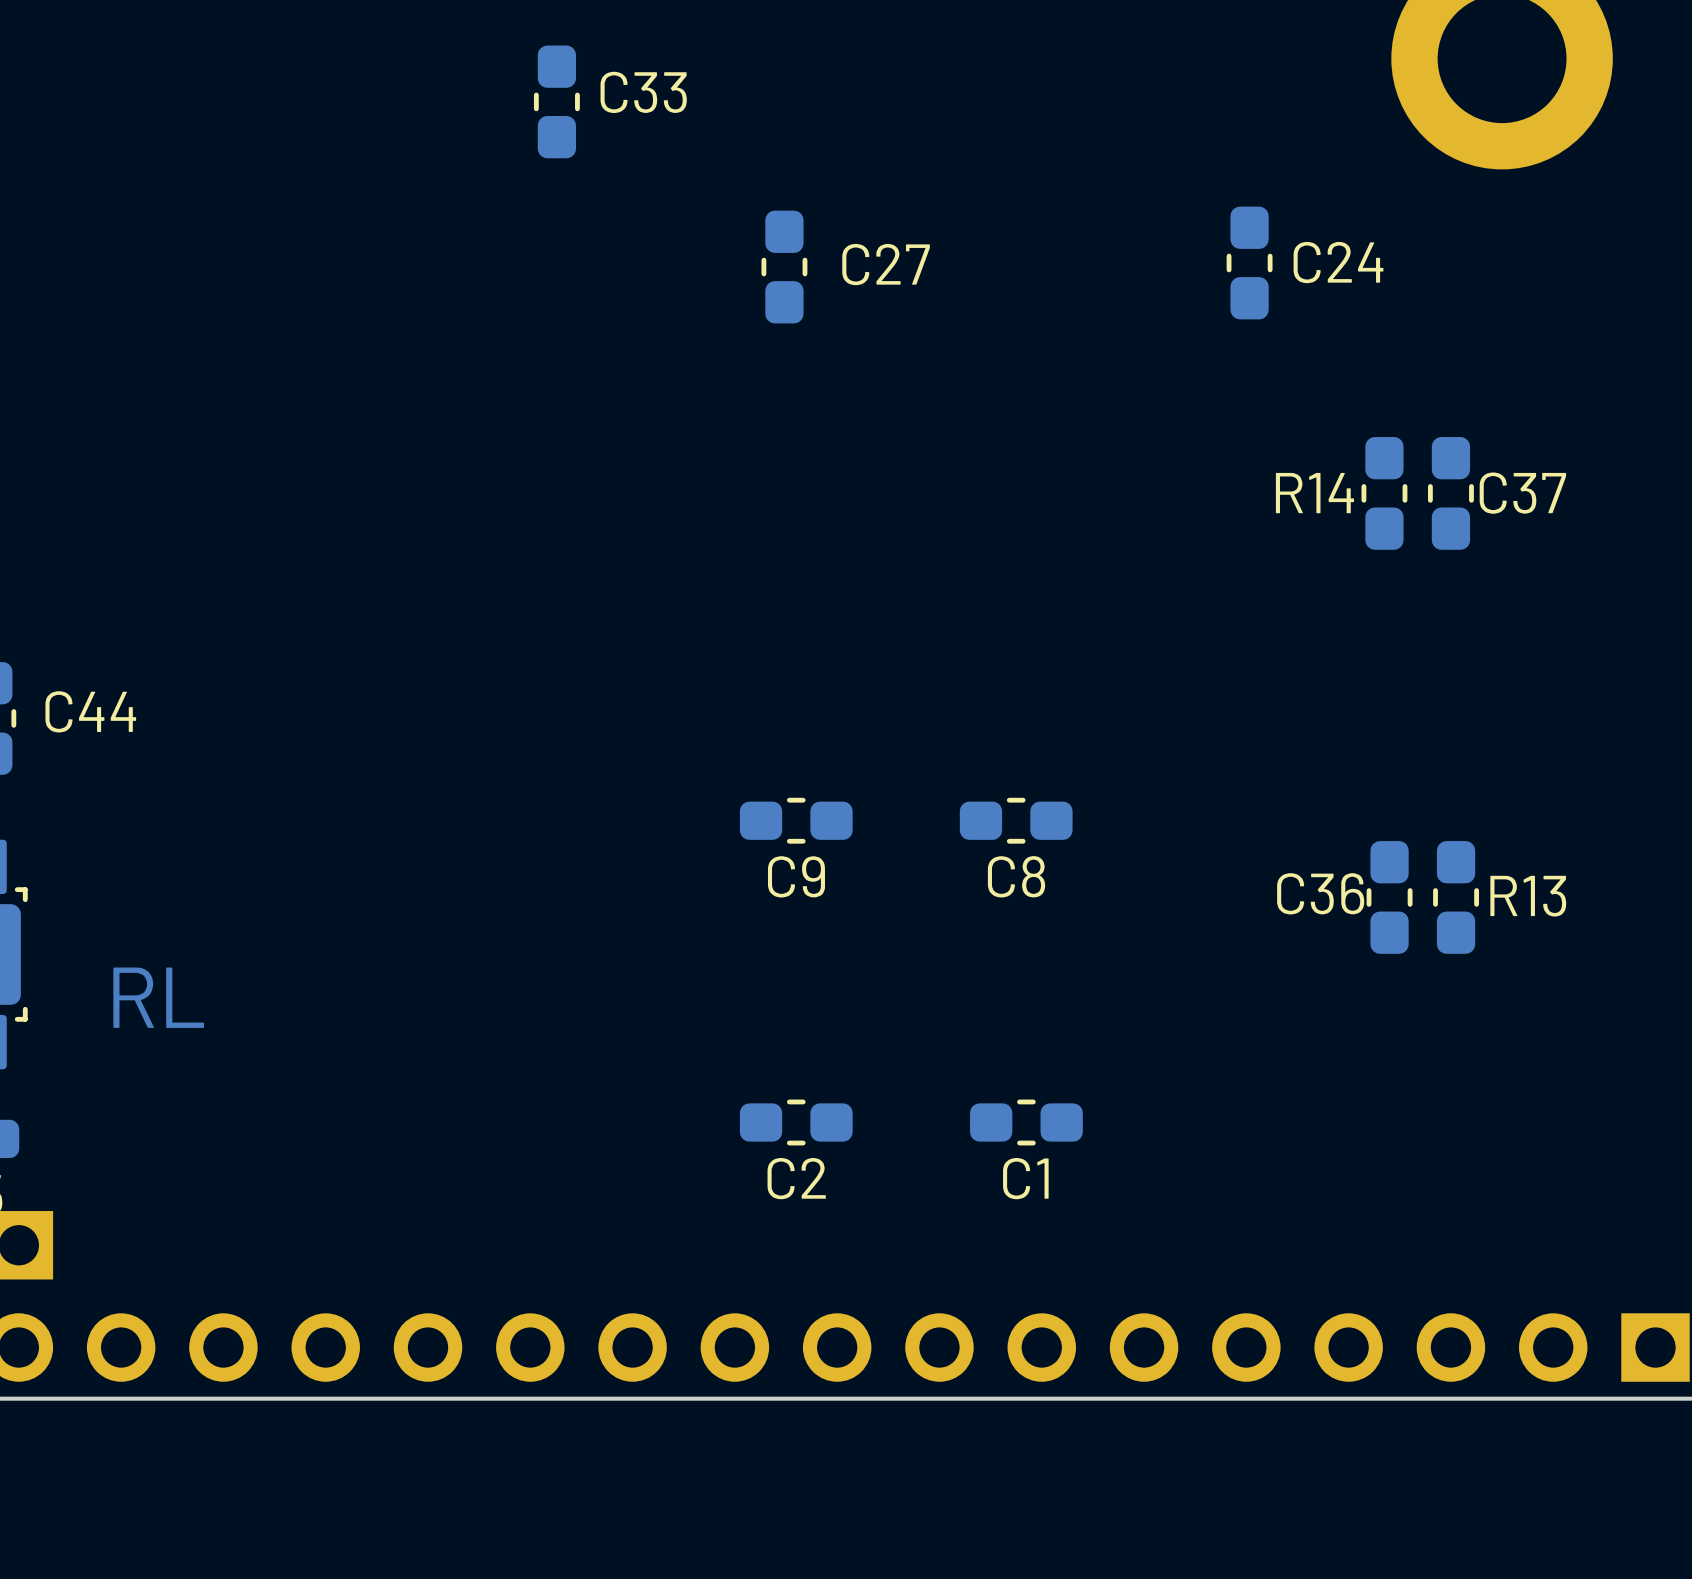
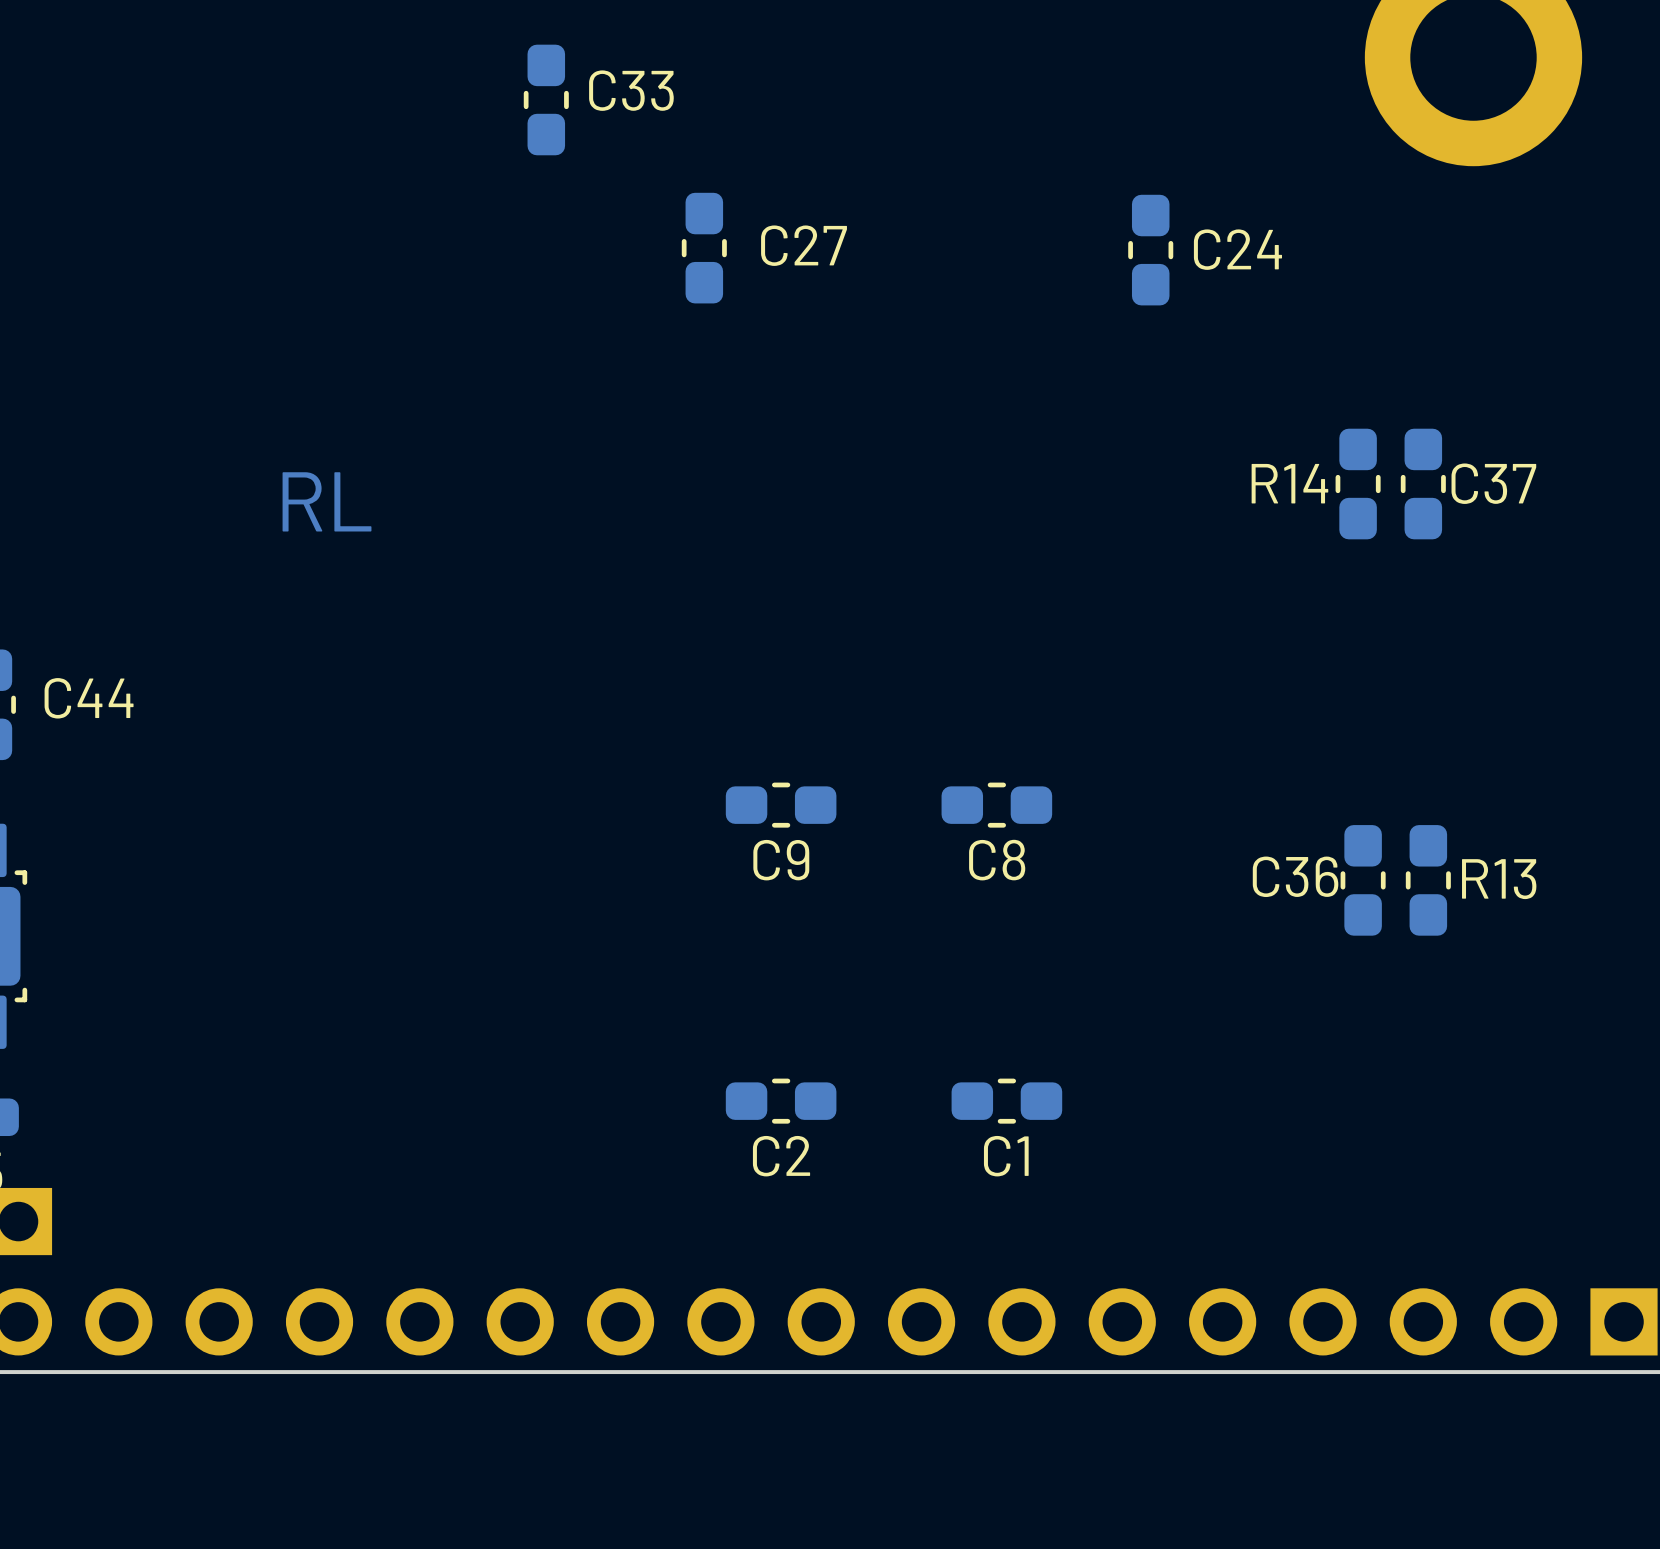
C24 position: (1249, 263) -> (1150, 250)
C27 position: (784, 267) -> (704, 248)
text position: RL (158, 997) -> RL (327, 501)

